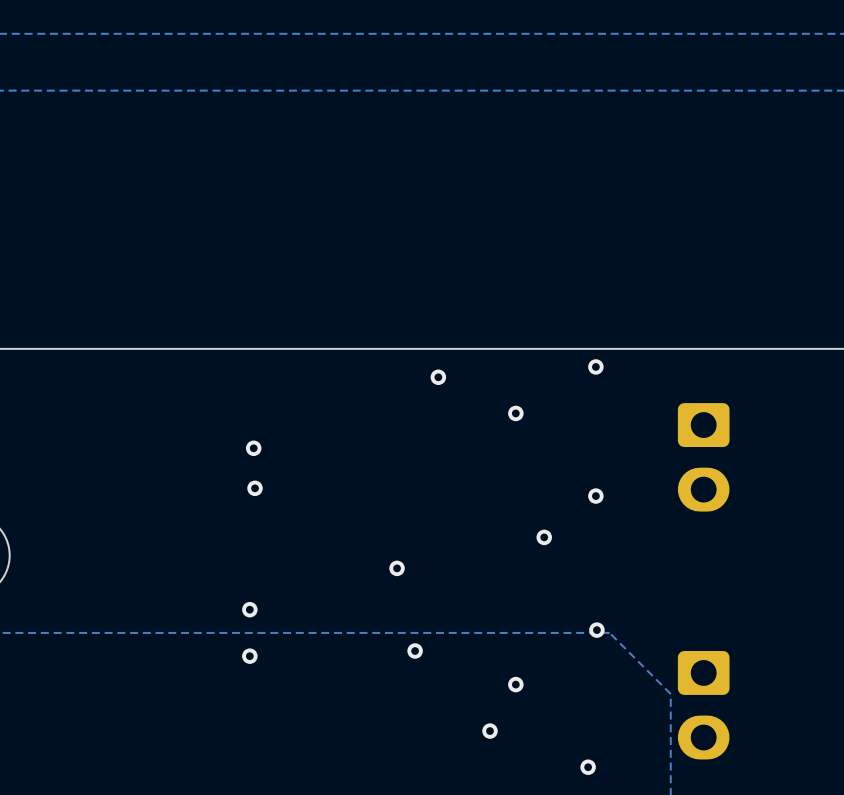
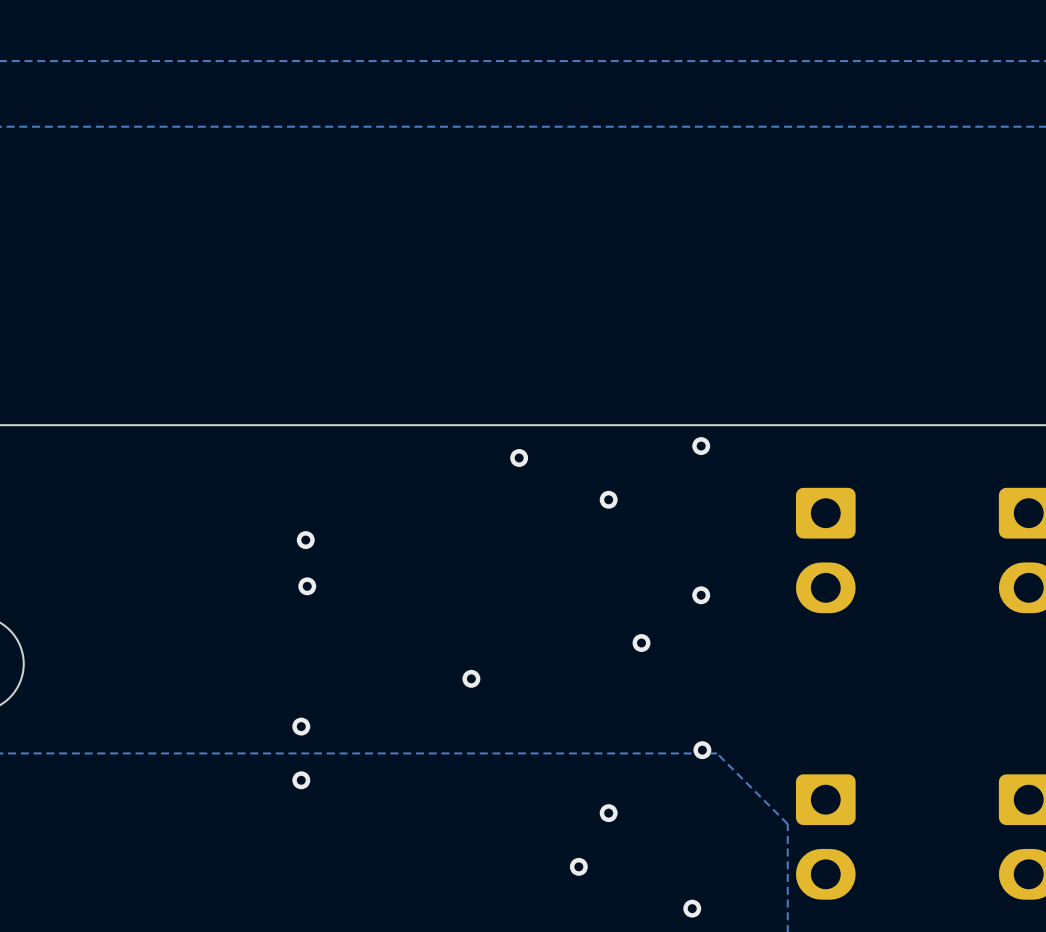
via: (415, 651) -> none

